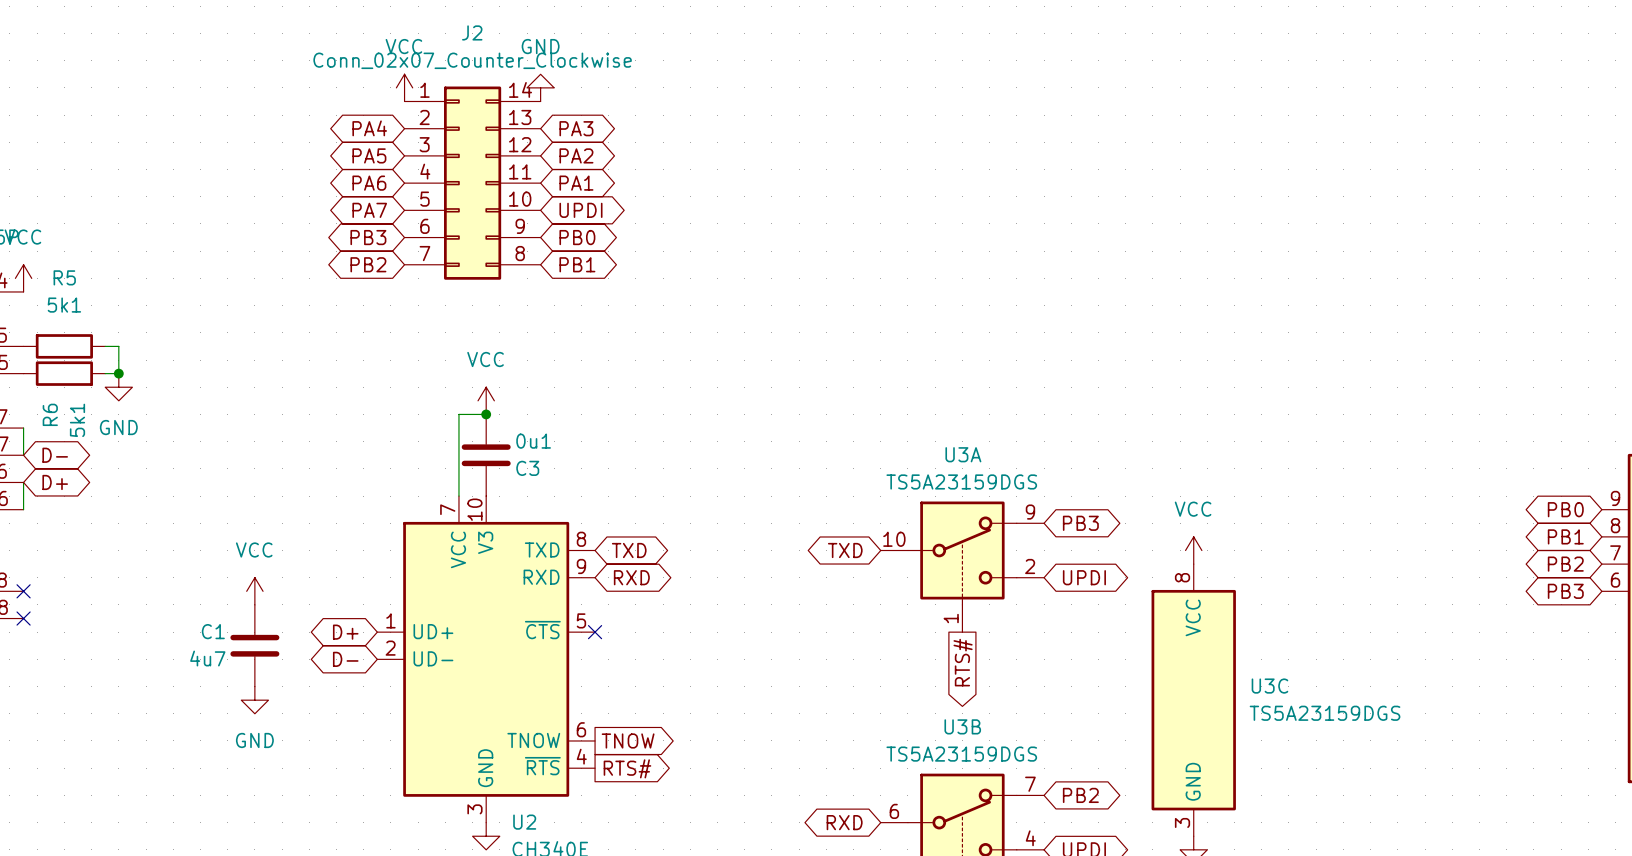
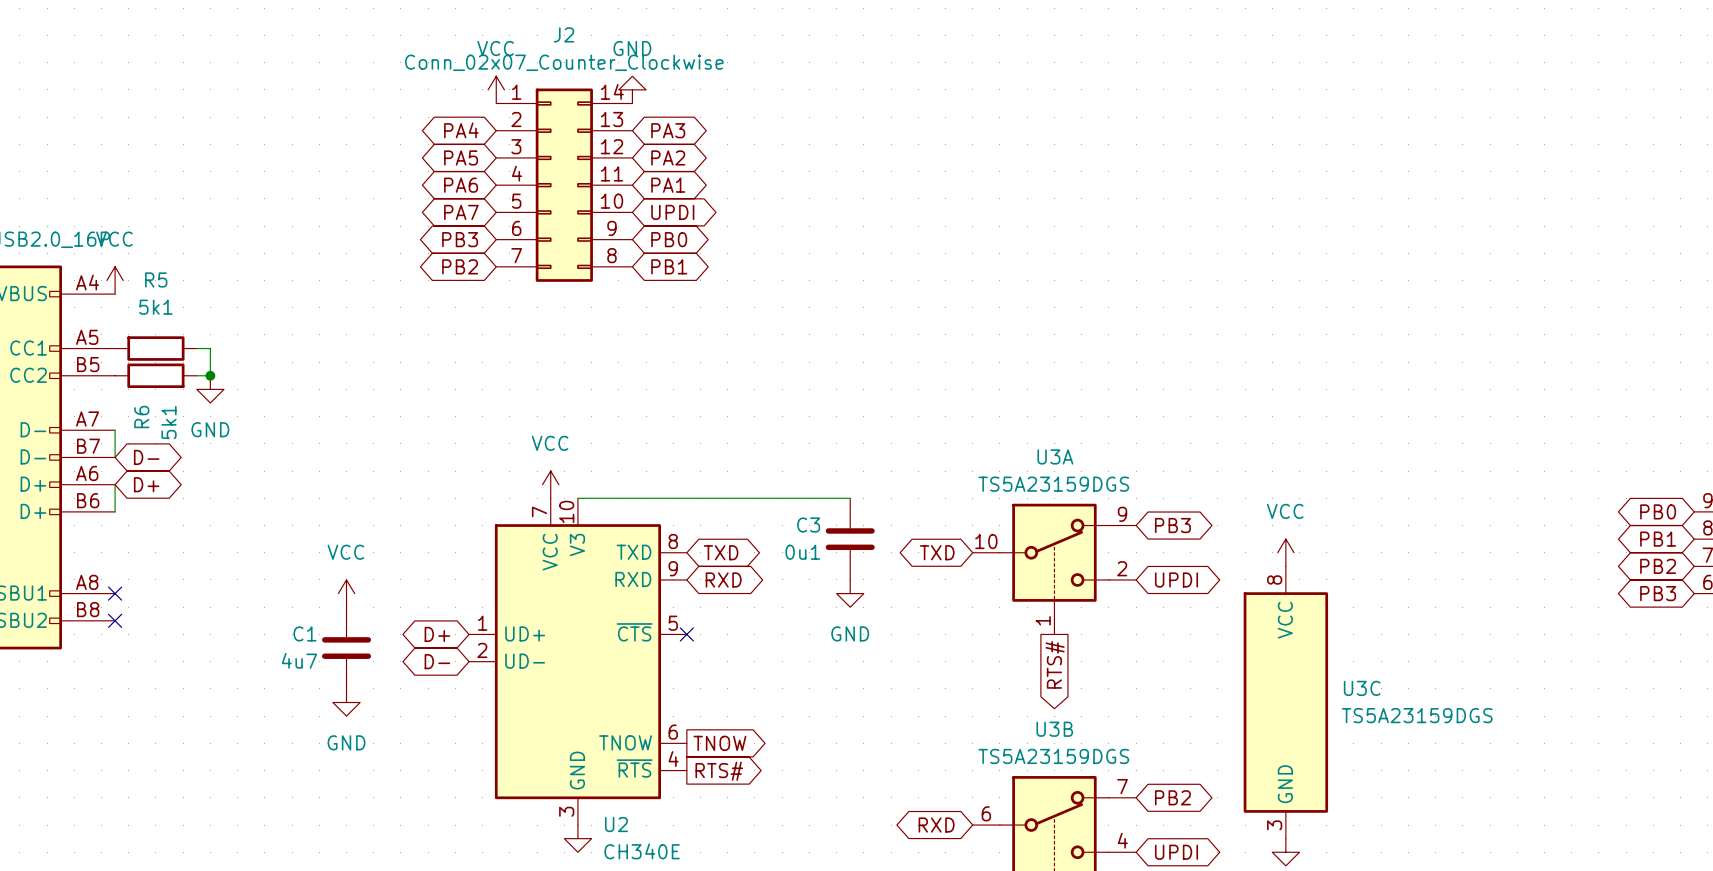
power symbol position: VCC (486, 400) -> VCC (550, 484)
wire: (486, 414) (458, 414) (458, 496) -> none
junction: (486, 414) -> none
C3 value position: 0u1 (533, 441) -> 0u1 (802, 552)
C3 position: (486, 455) -> (850, 539)
C3 name position: C3 (527, 468) -> C3 (808, 525)
wire: none -> (577, 498) (850, 498)
power symbol: none -> GND (850, 593)

